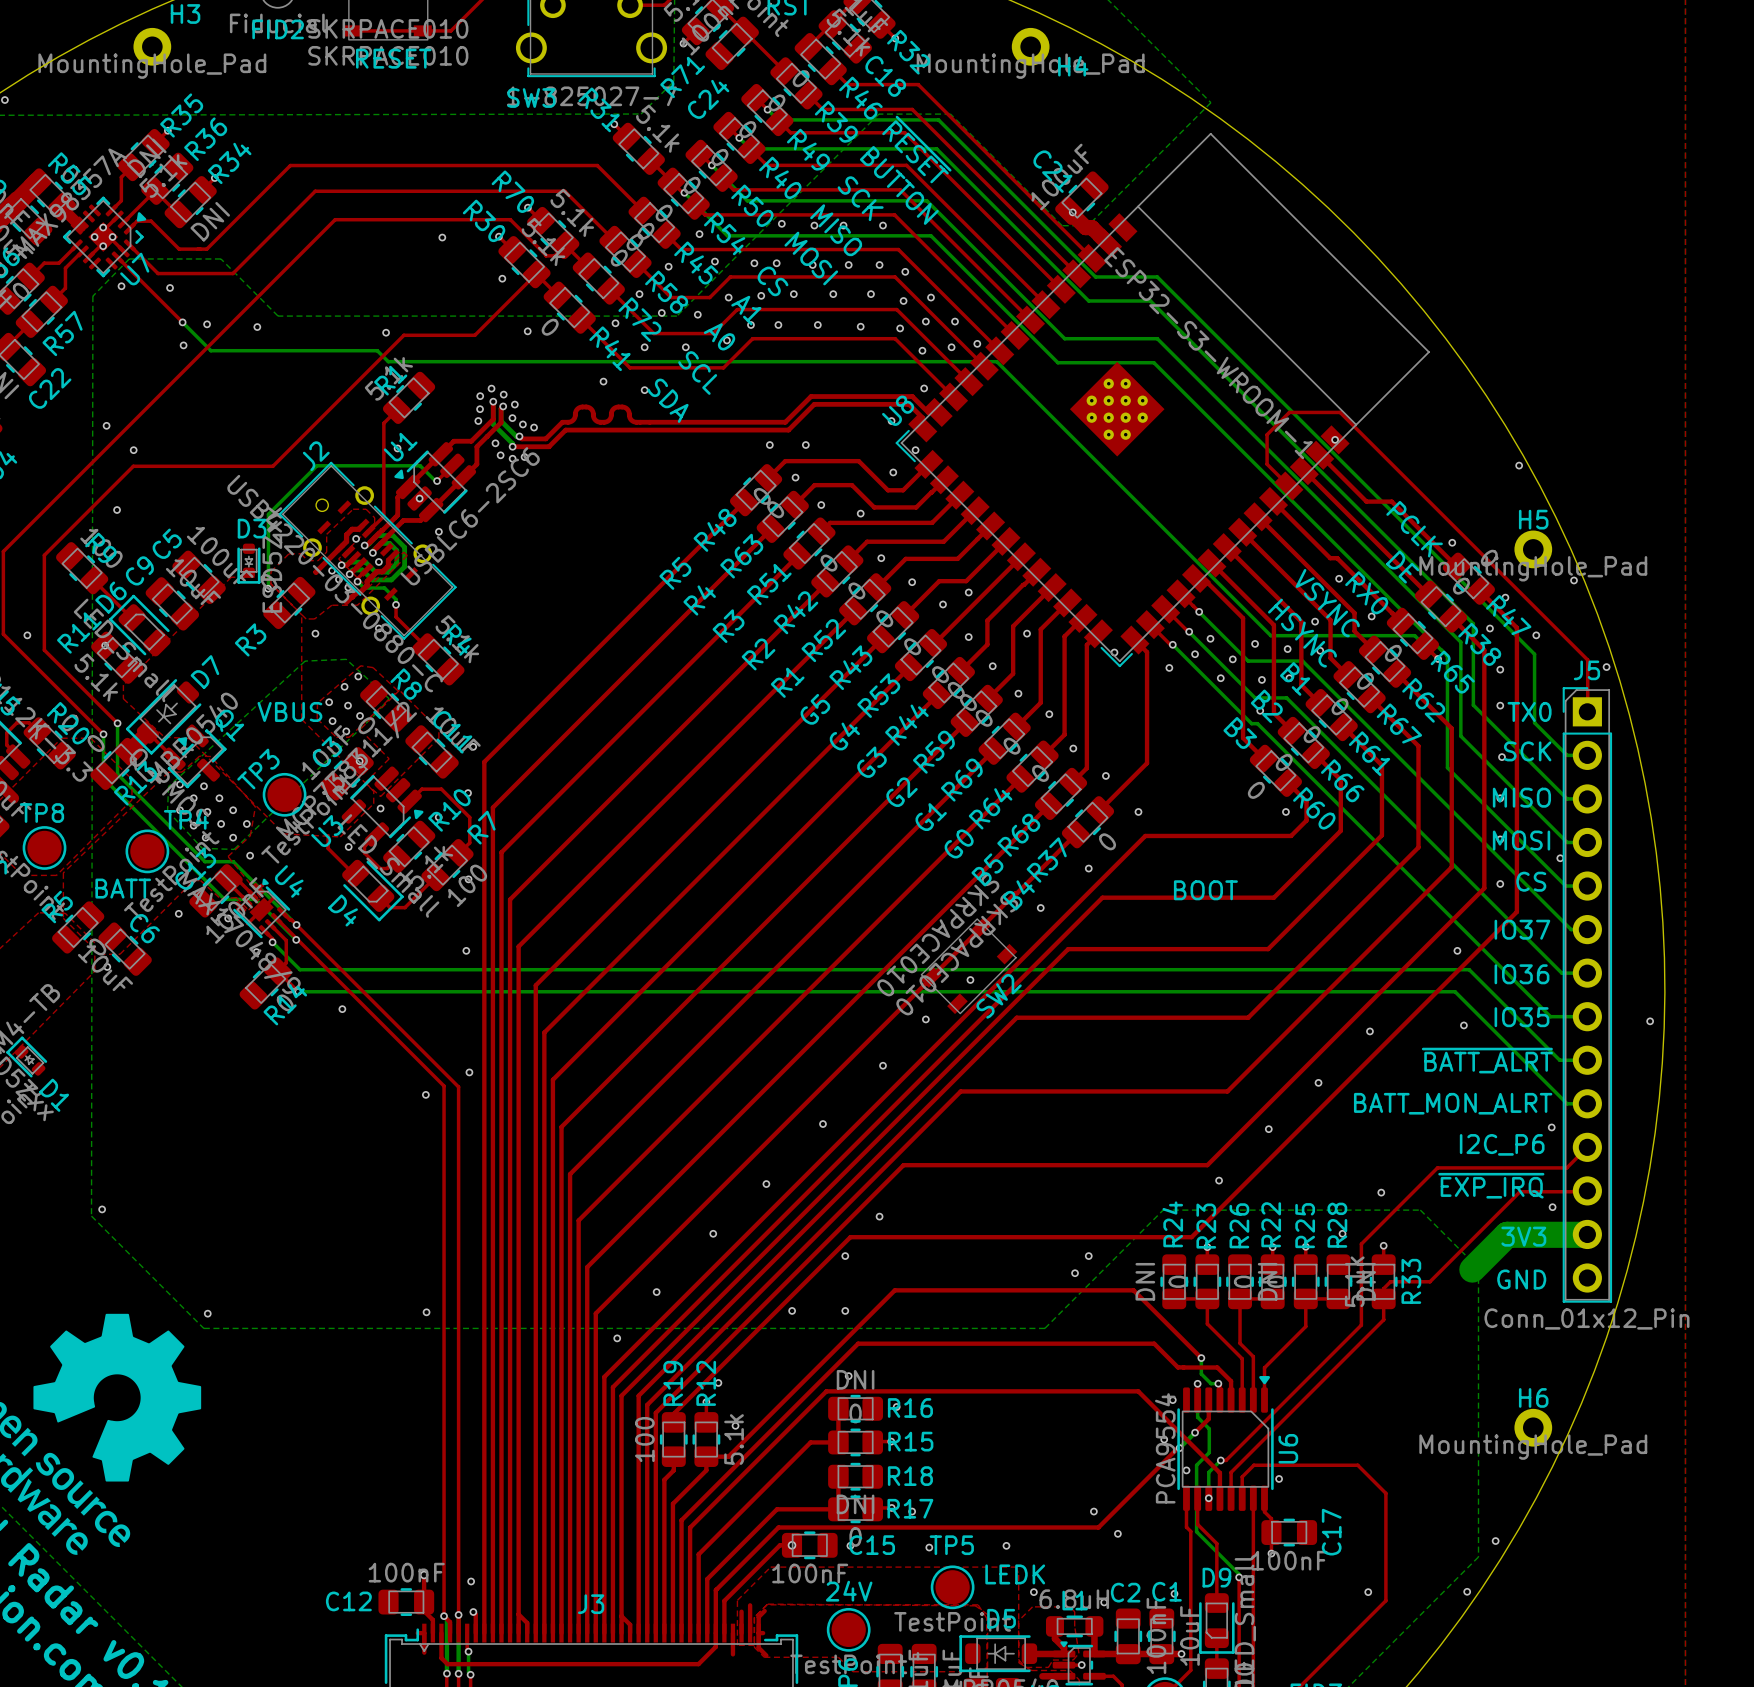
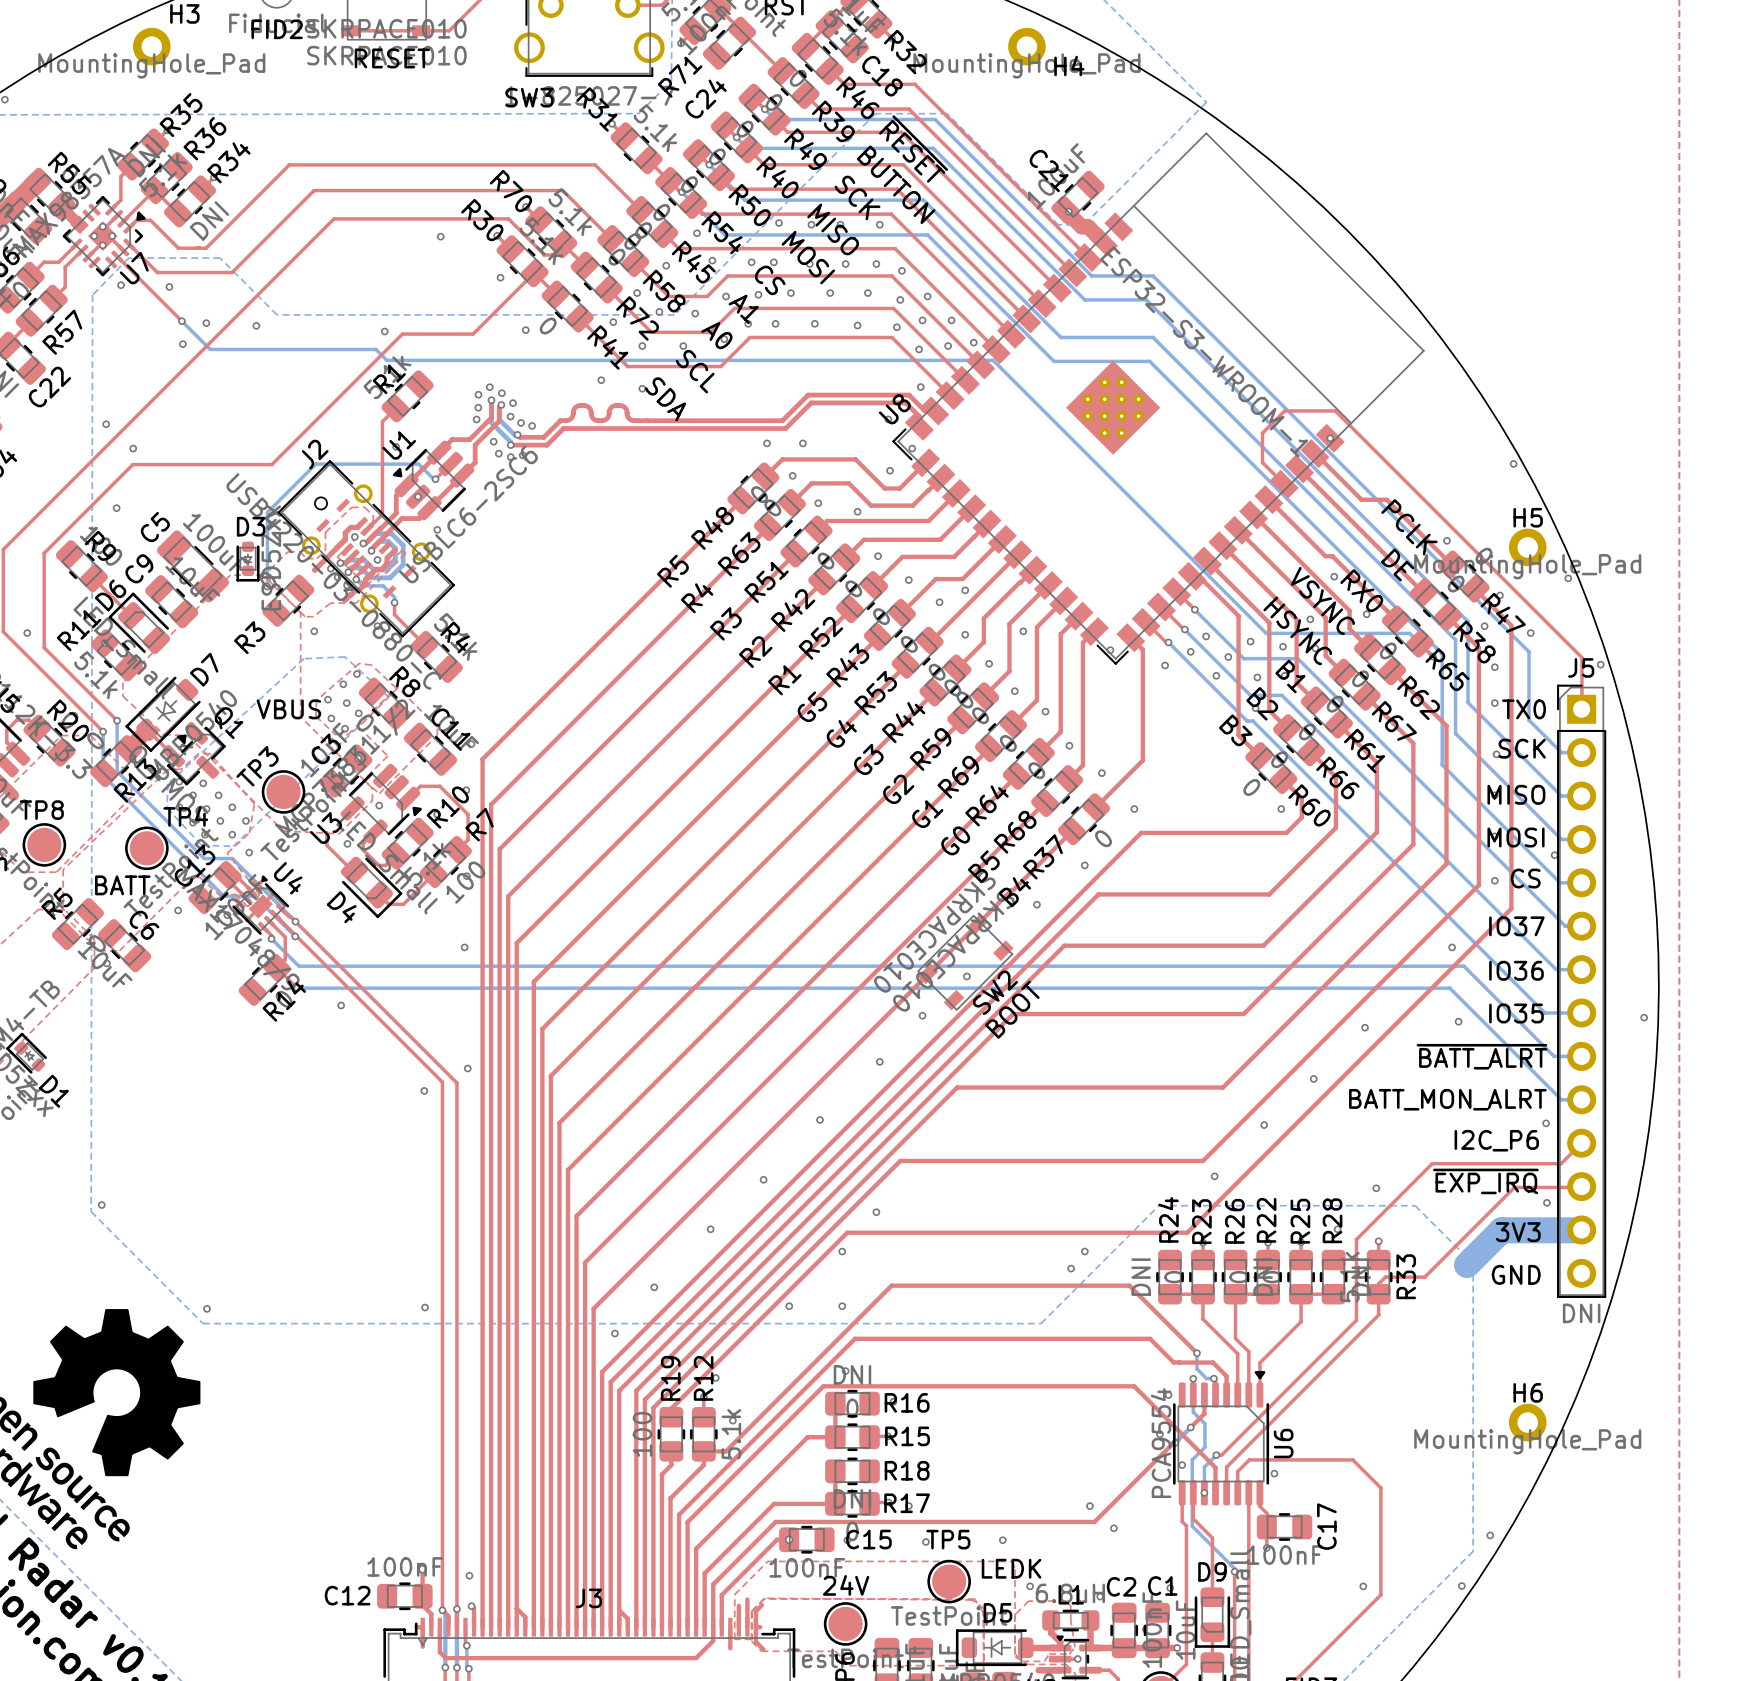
C5 footprint: [172, 550, 226, 605] -> [157, 530, 229, 603]
text rotation: 0° (1205, 890) -> 45° counterclockwise (1012, 1009)
text position: BOOT (1205, 890) -> BOOT (1012, 1009)
J5 value: Conn_01x12_Pin (1586, 1318) -> DNI (1581, 1313)

